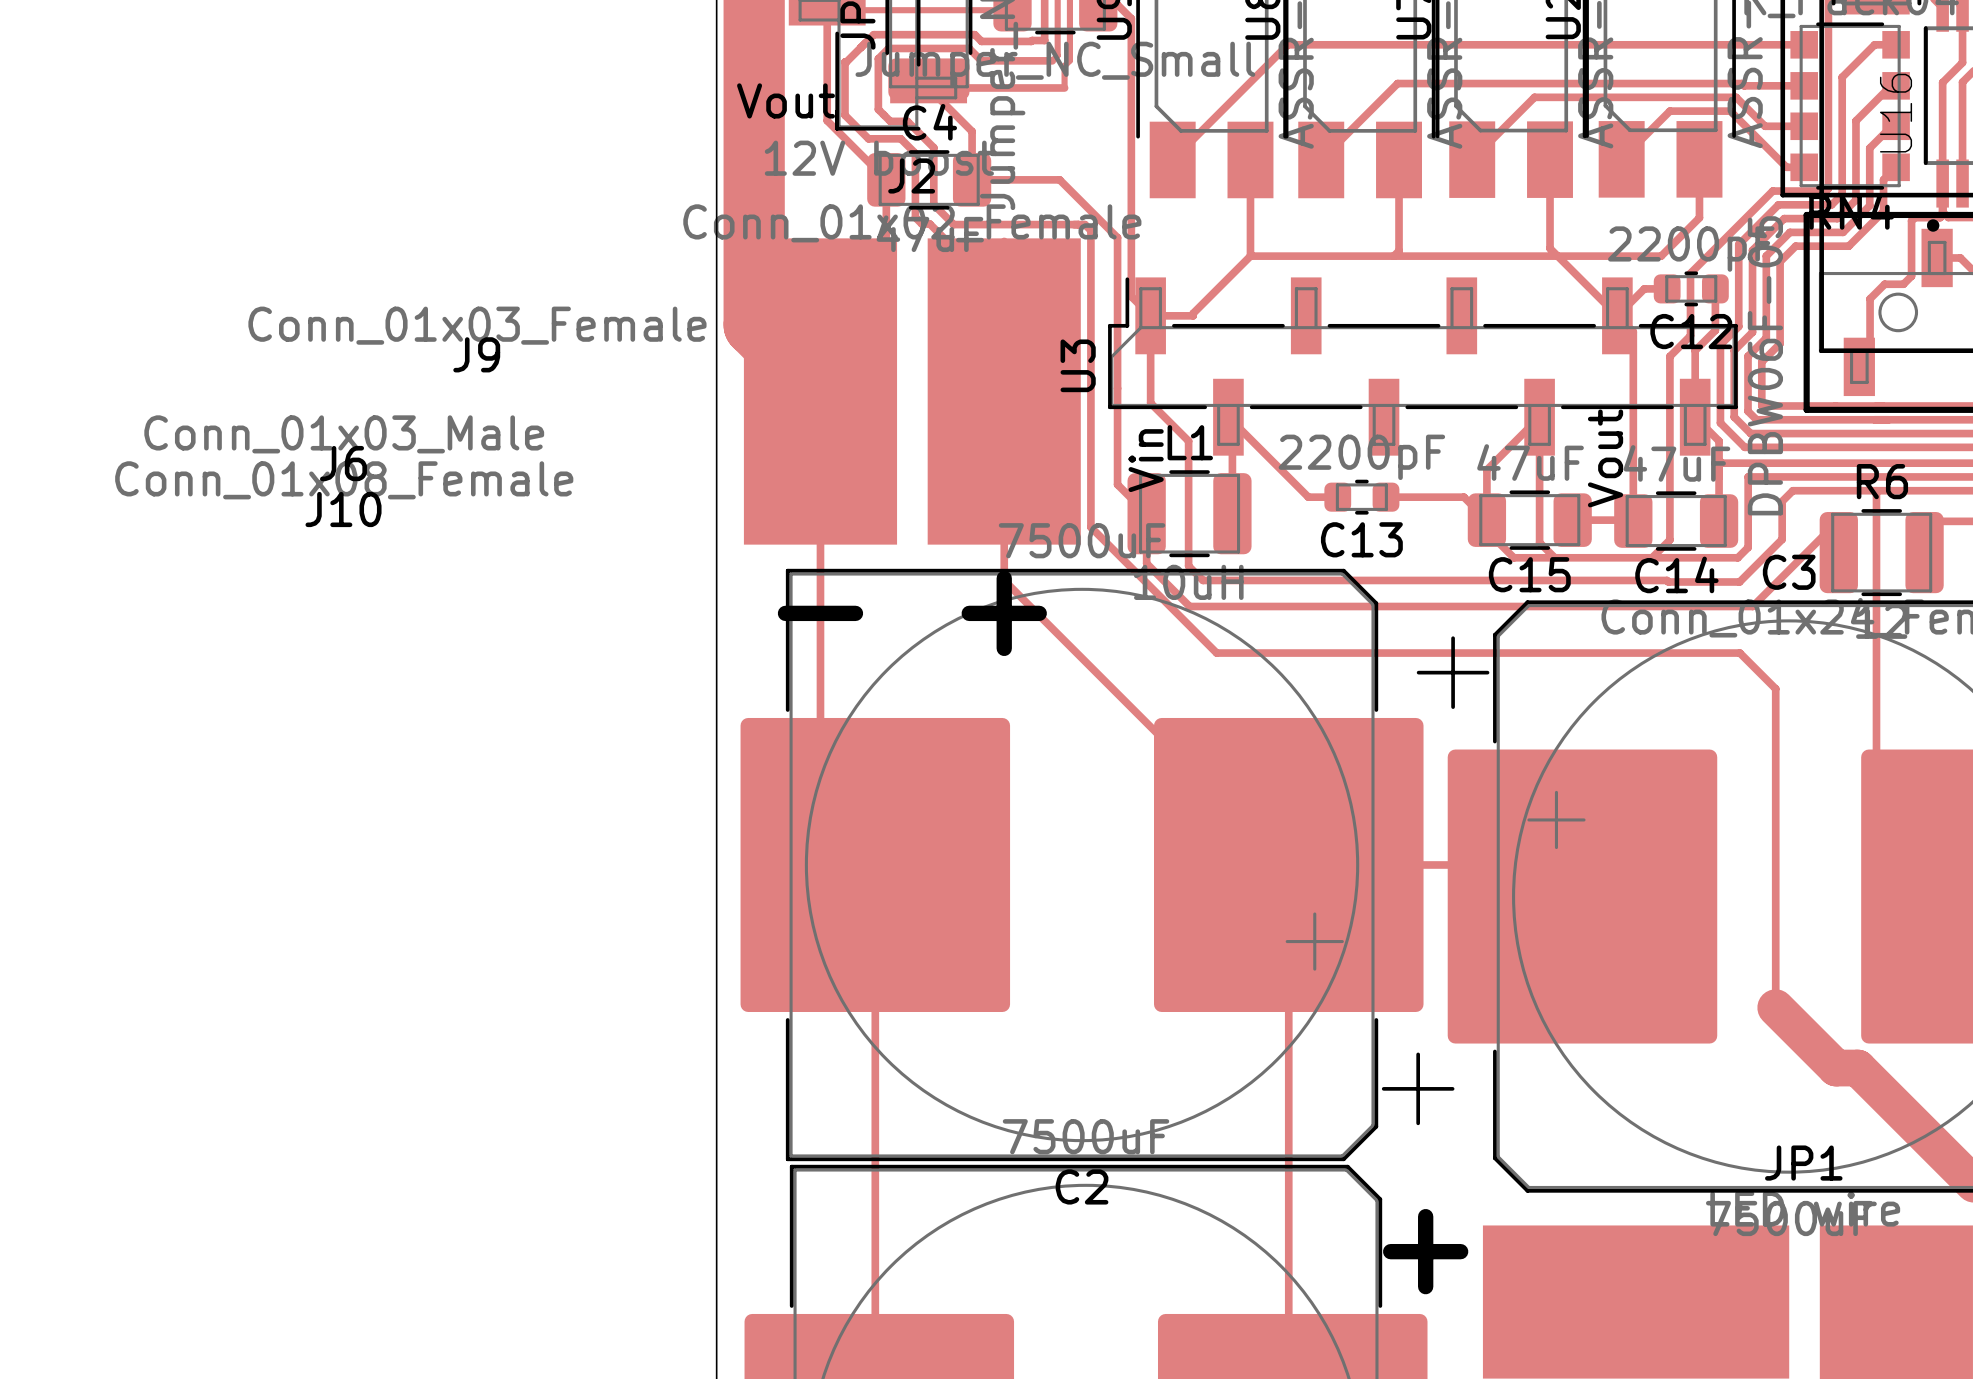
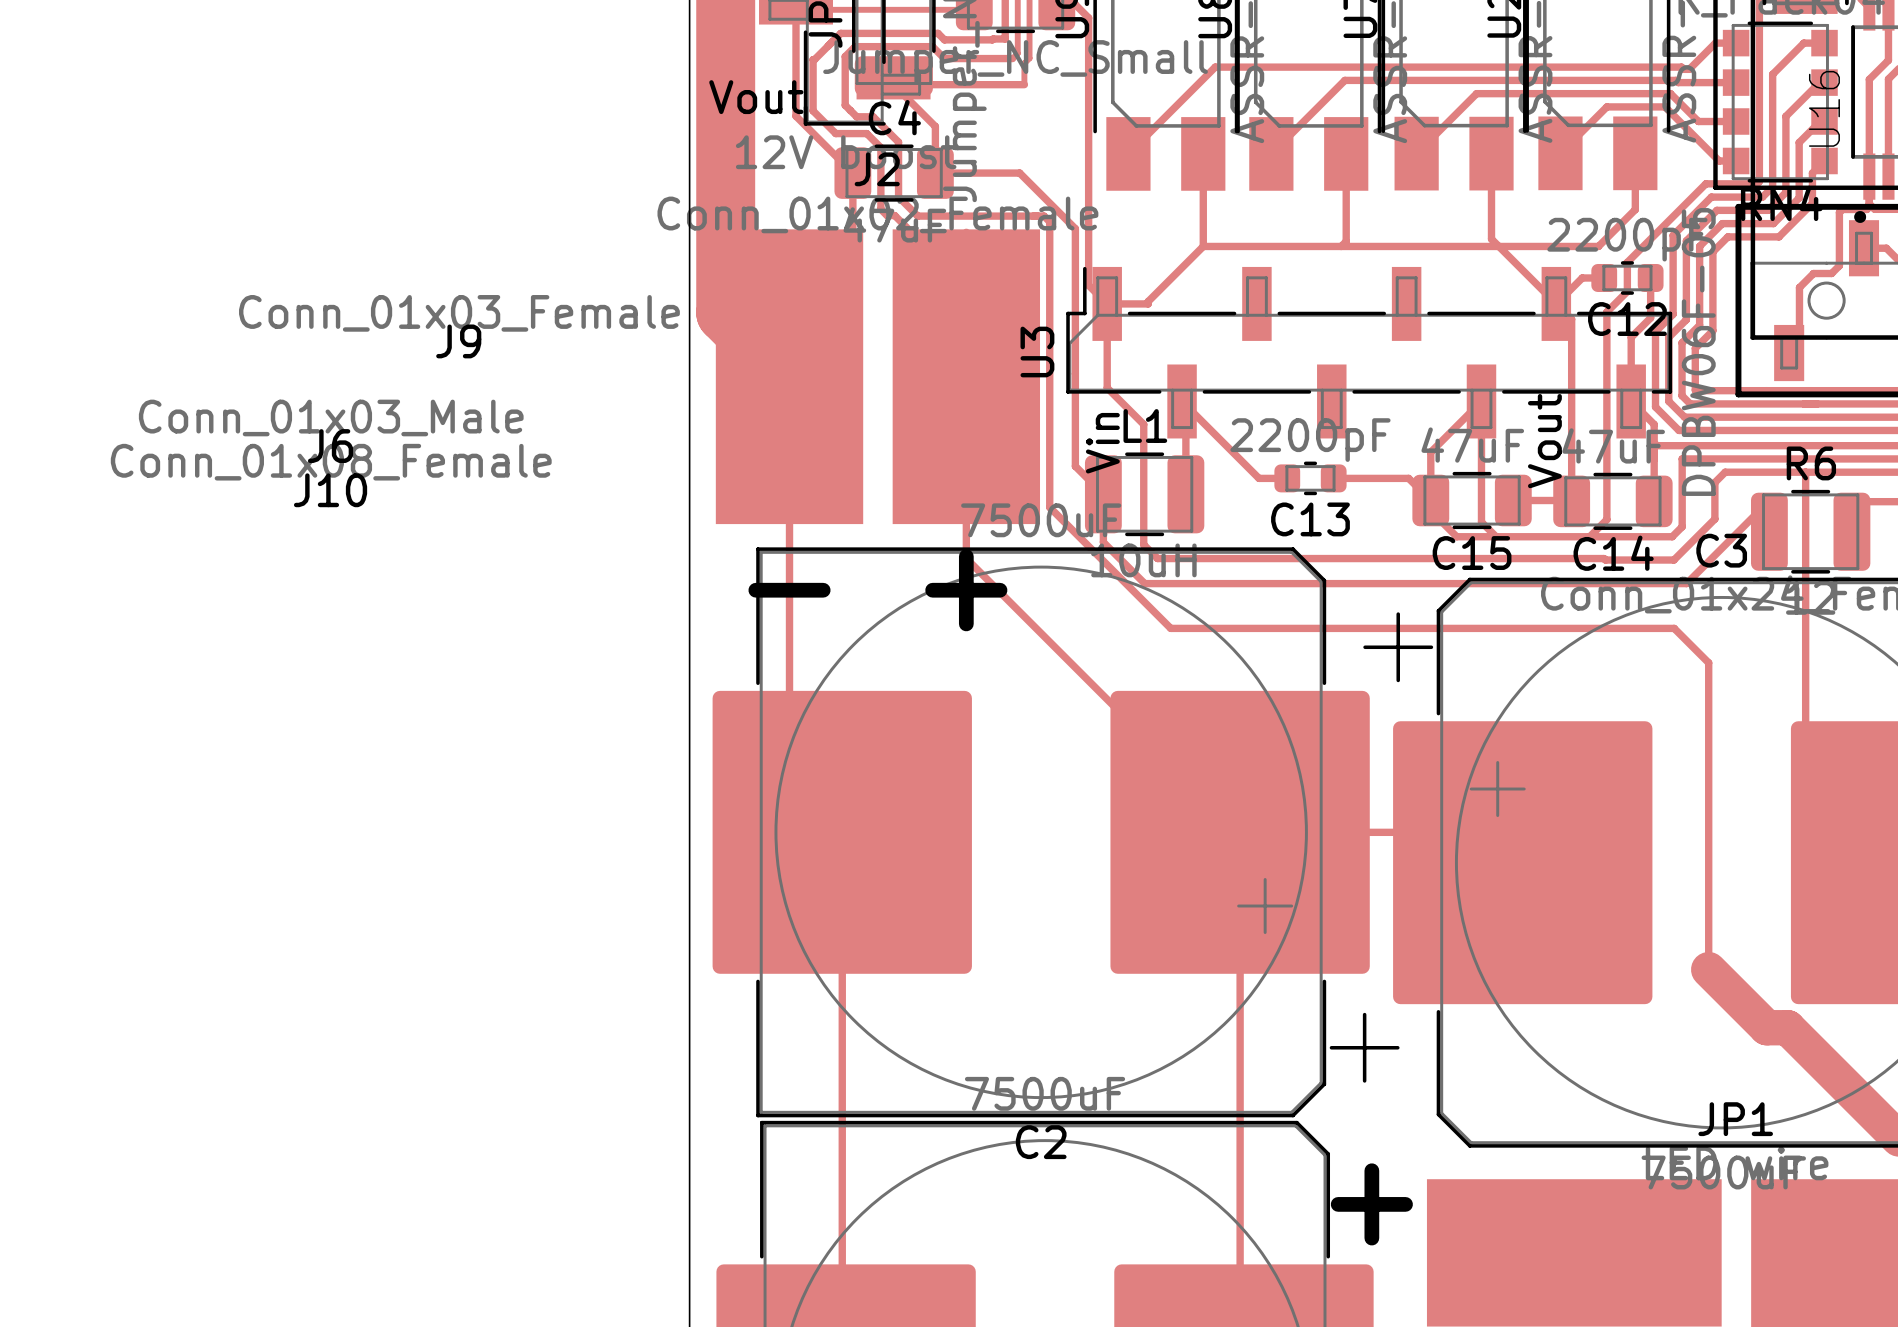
top track: (1782, 44) (1287, 44) (1262, 69) -> (1715, 43) (1689, 69) (1683, 69) (1681, 67) (1215, 67)
top track: (1690, 273) (1690, 335) (1669, 356) -> (1626, 263) (1627, 291) (1606, 312) (1606, 342)

